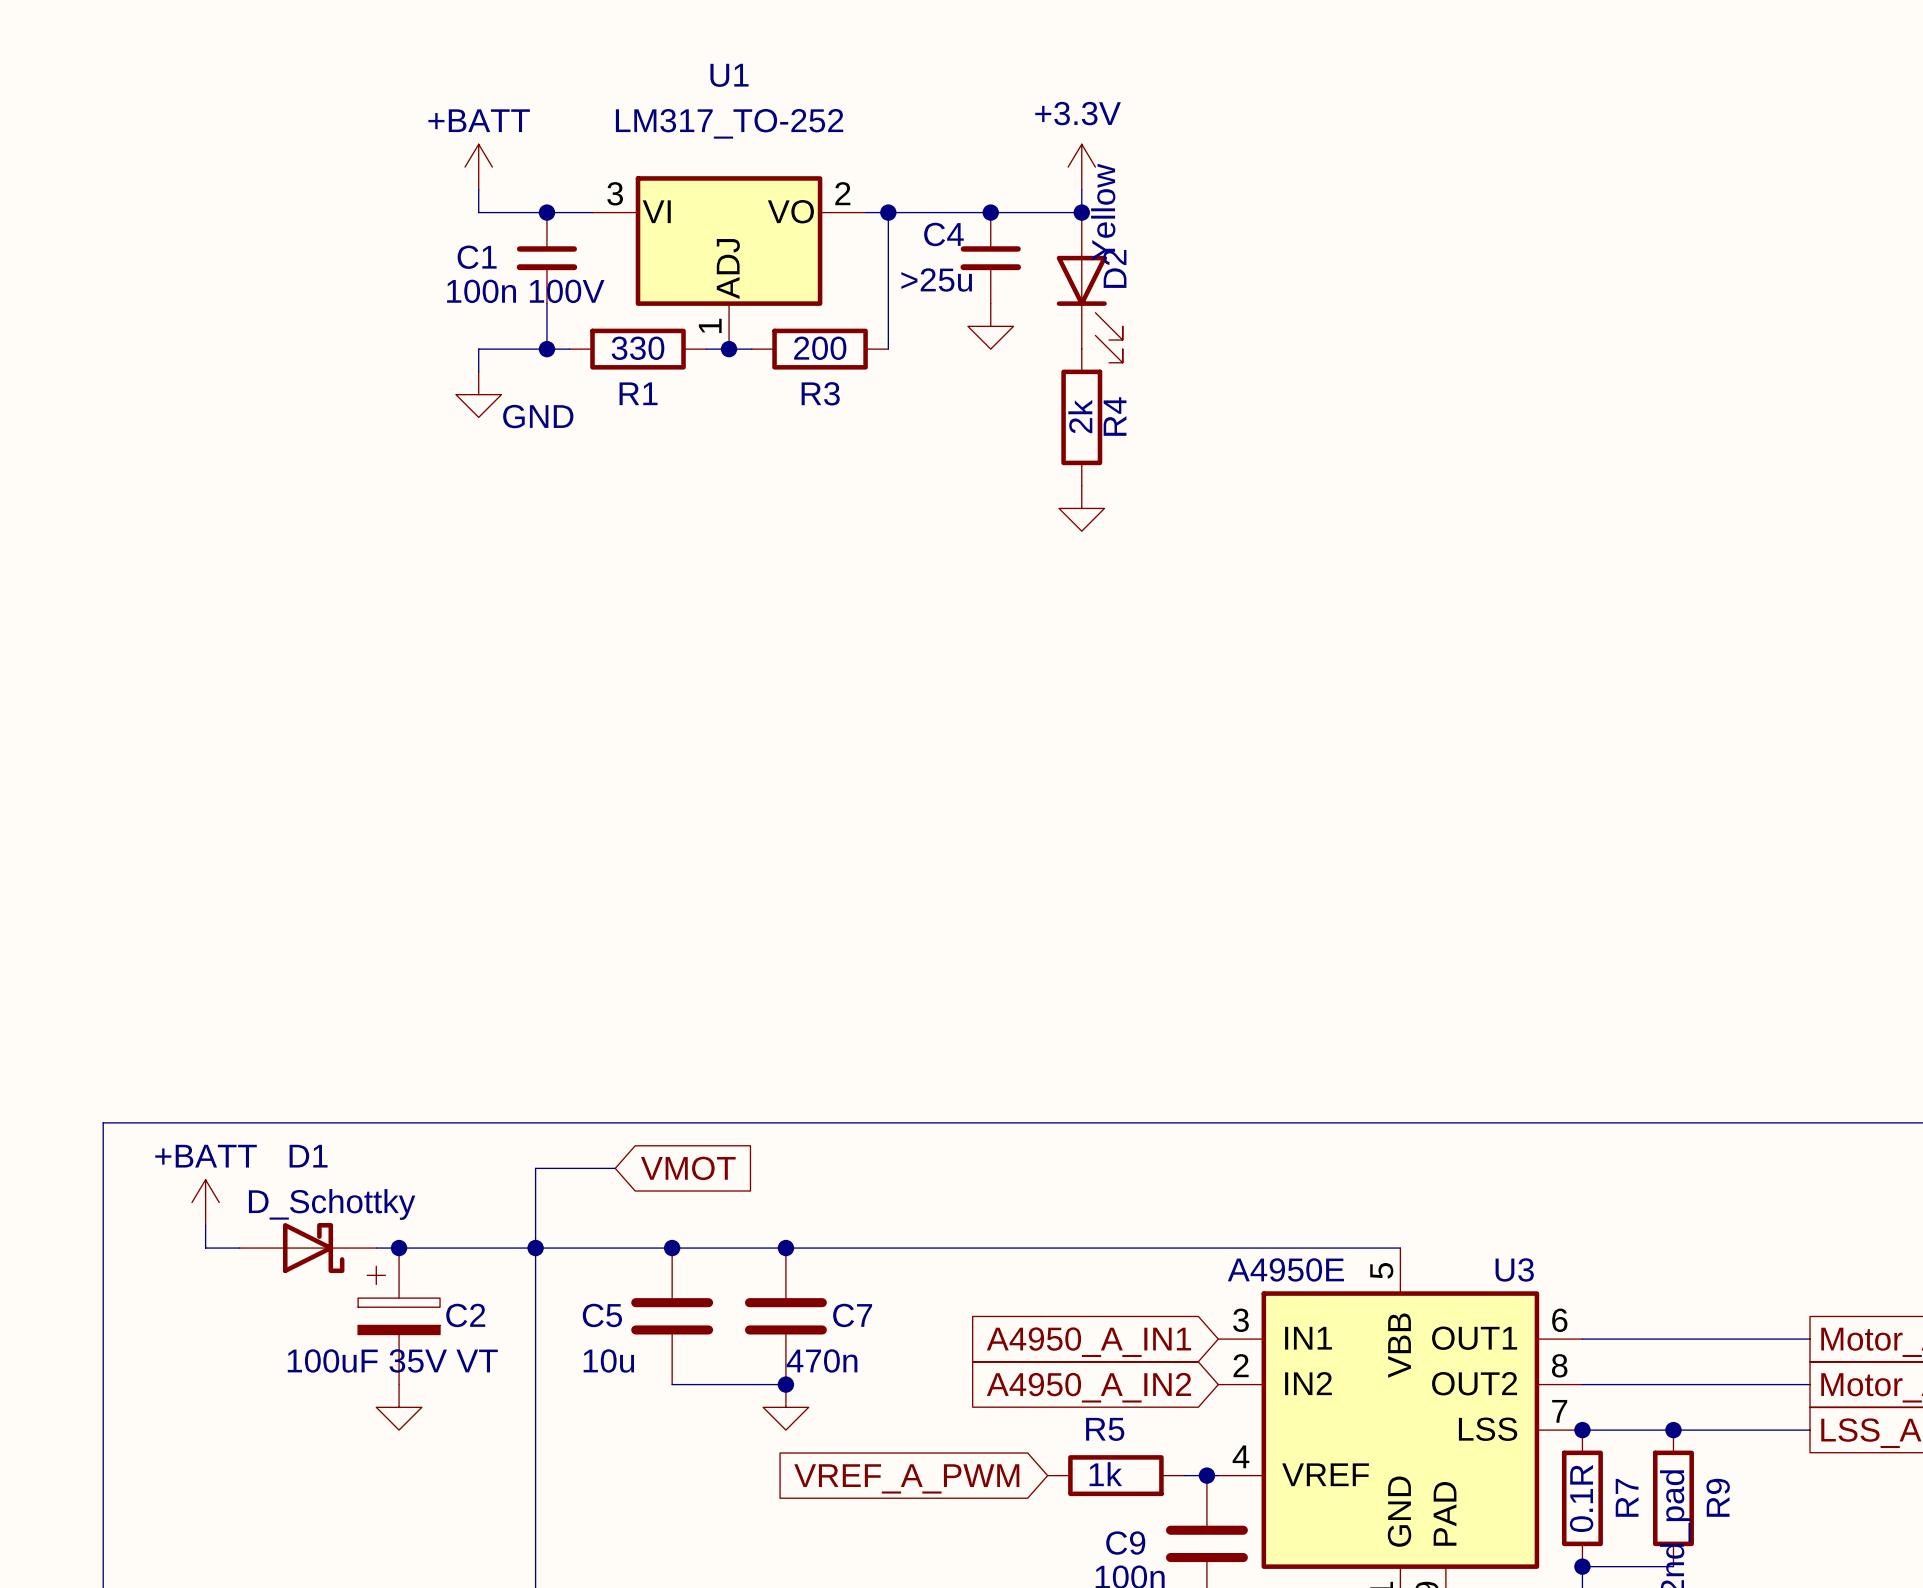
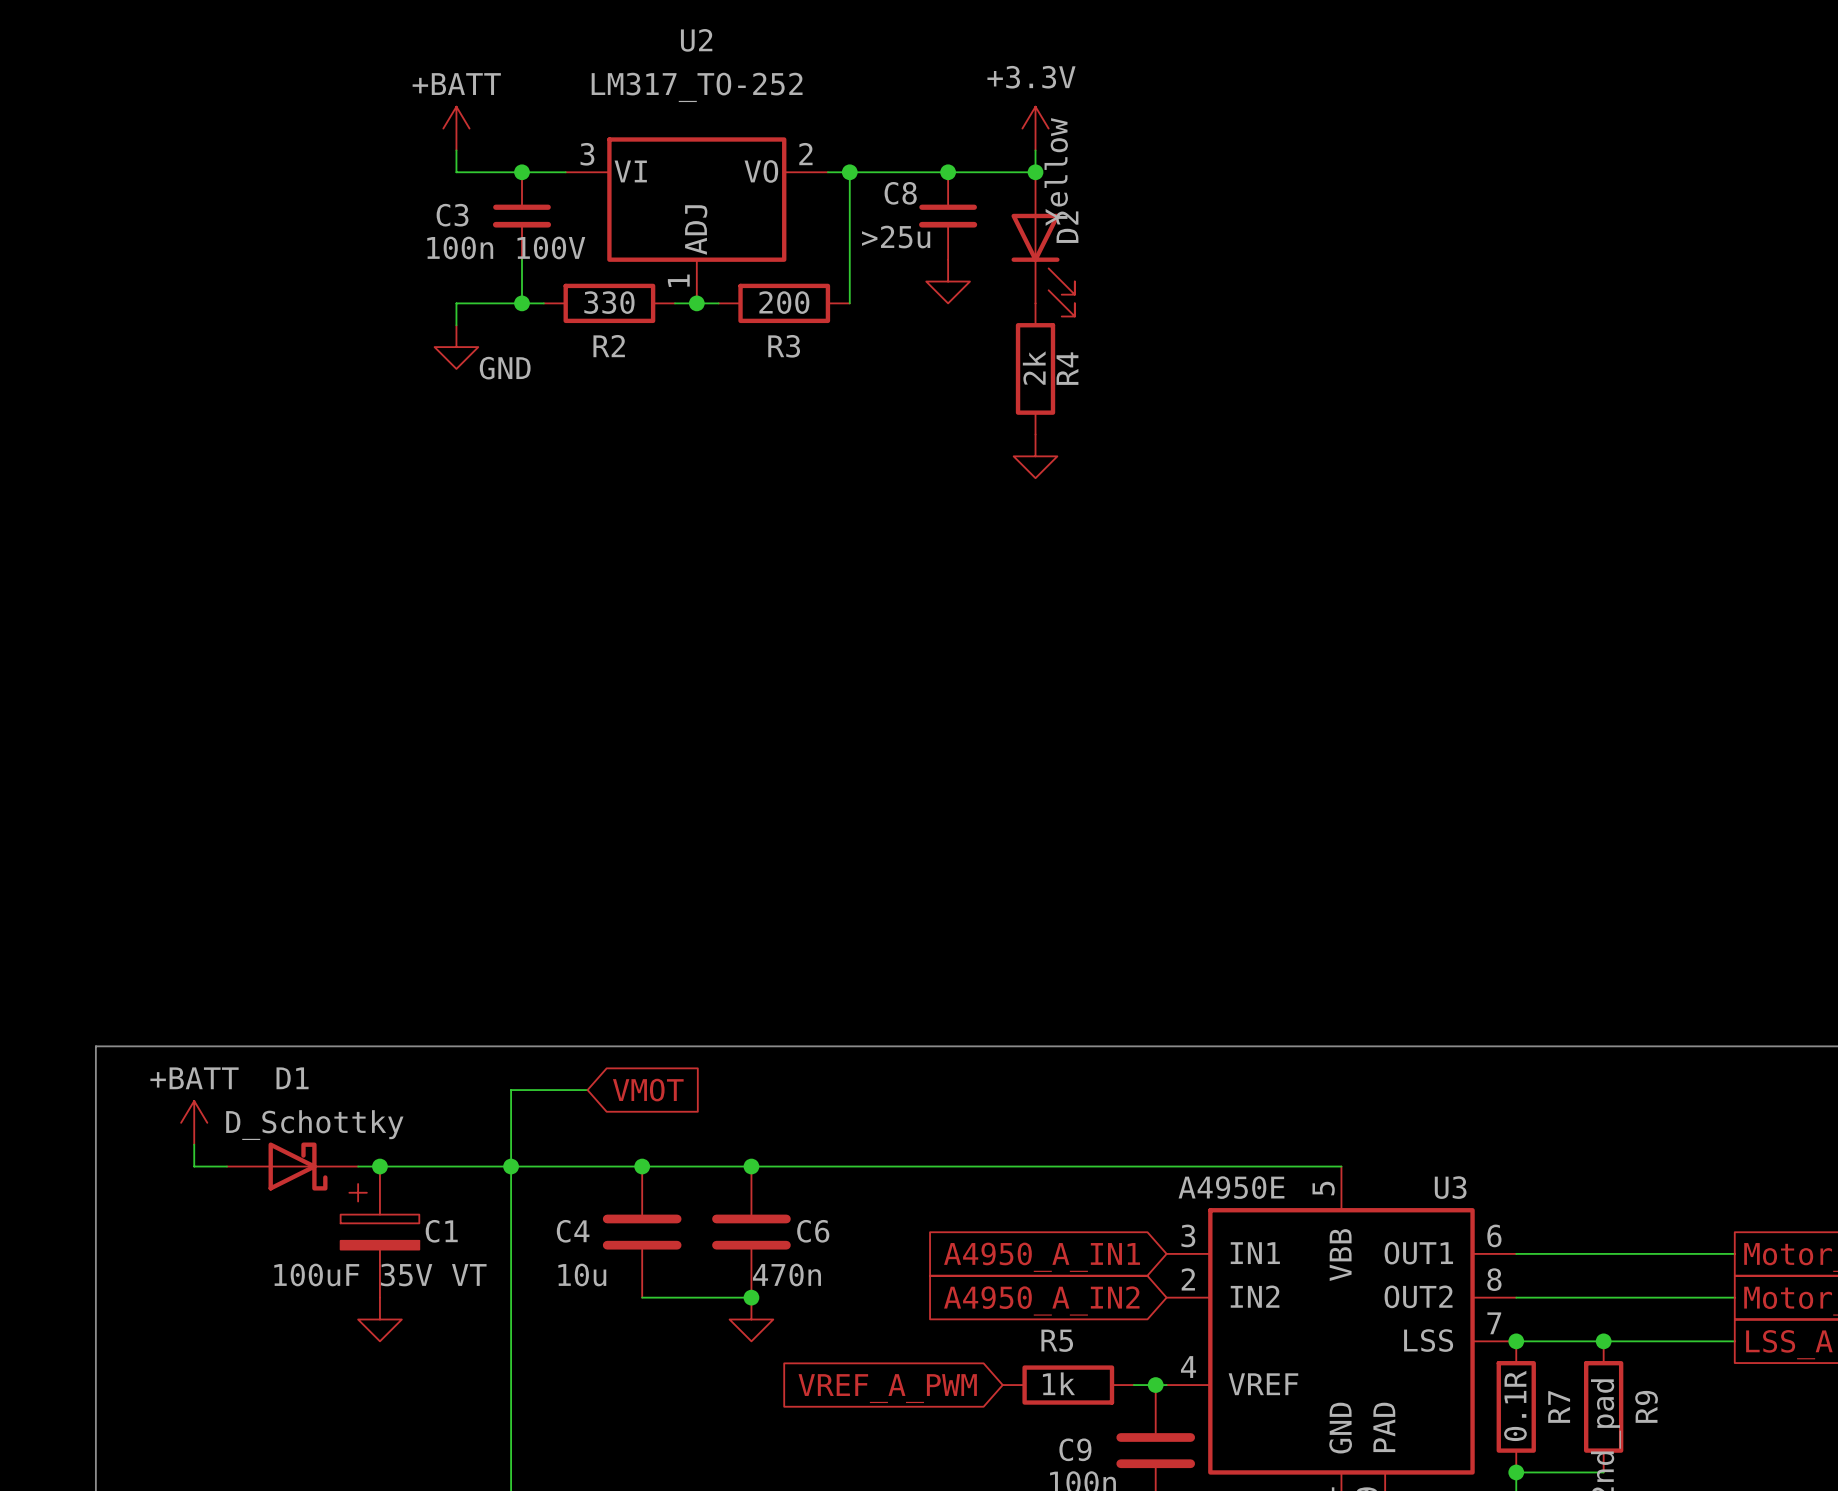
U1 name: U1 (729, 75) -> U2 (696, 40)
C4 name: C4 (943, 234) -> C8 (900, 193)
C1 name: C1 (477, 257) -> C3 (452, 215)
R1 name: R1 (638, 393) -> R2 (609, 346)
C2 name: C2 (465, 1315) -> C1 (441, 1231)
C5 name: C5 (602, 1315) -> C4 (573, 1231)
C7 name: C7 (852, 1315) -> C6 (813, 1231)

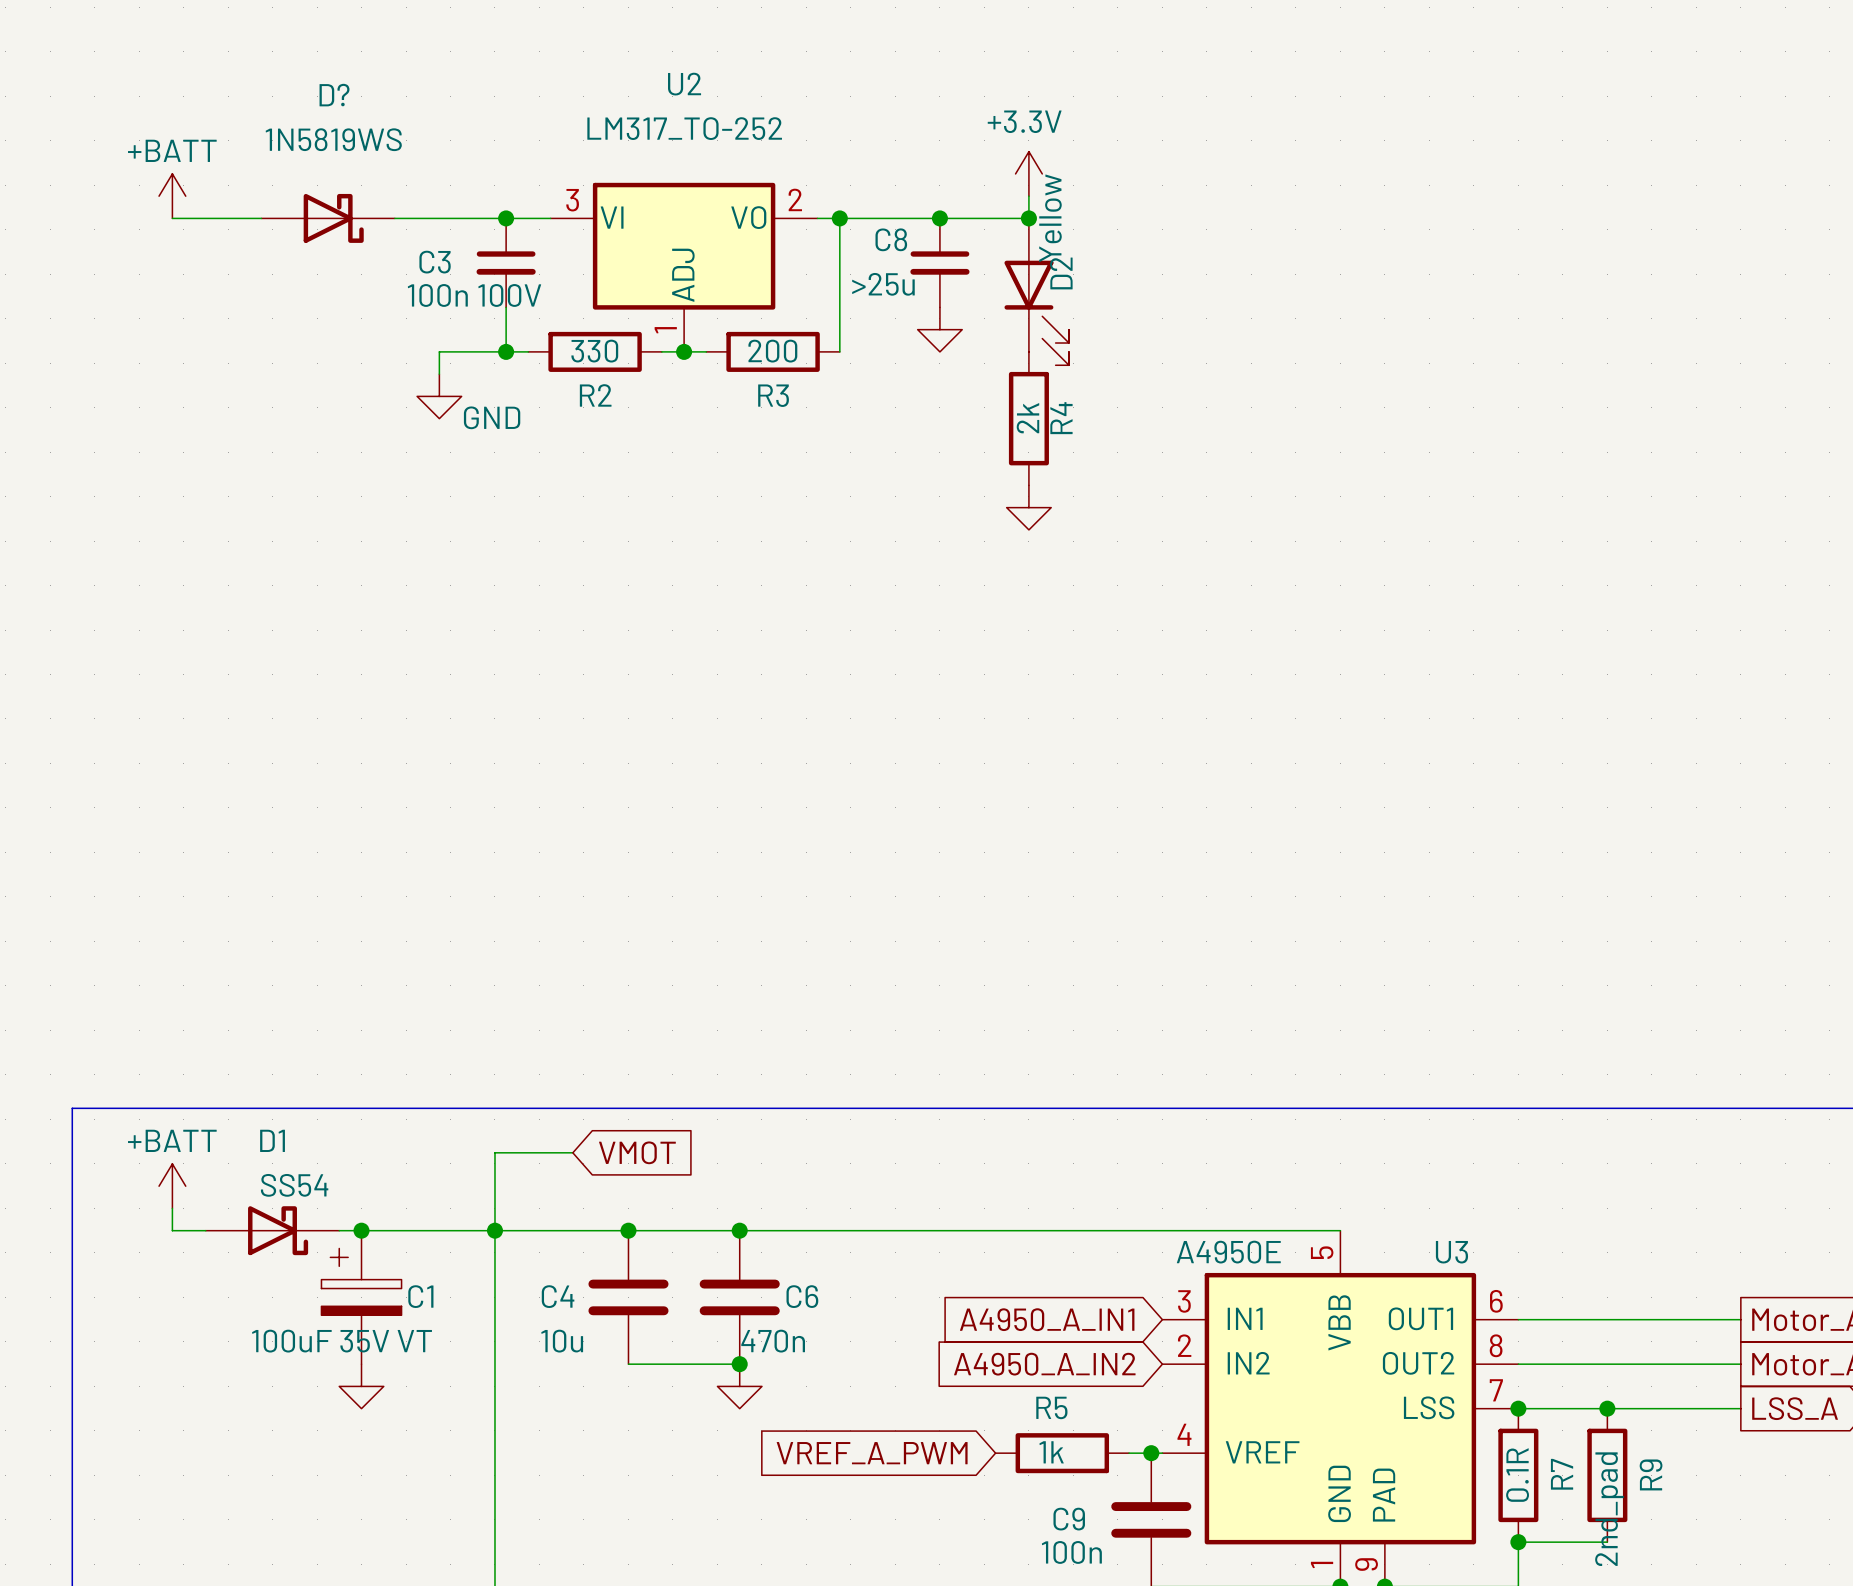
power symbol position: +BATT (456, 128) -> +BATT (172, 196)
wire: (456, 150) (456, 172) -> (394, 218) (439, 218)
wire: none -> (172, 218) (261, 218)
D?: none -> 1N5819WS (328, 218)
D1 value: D_Schottky (314, 1125) -> SS54 (294, 1185)

